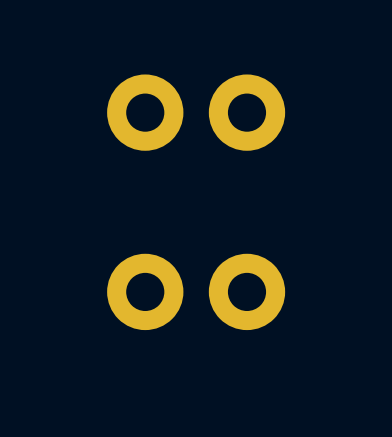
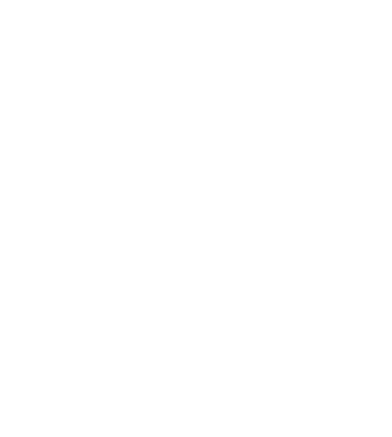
part: (196, 112) -> none
part: (196, 291) -> none

